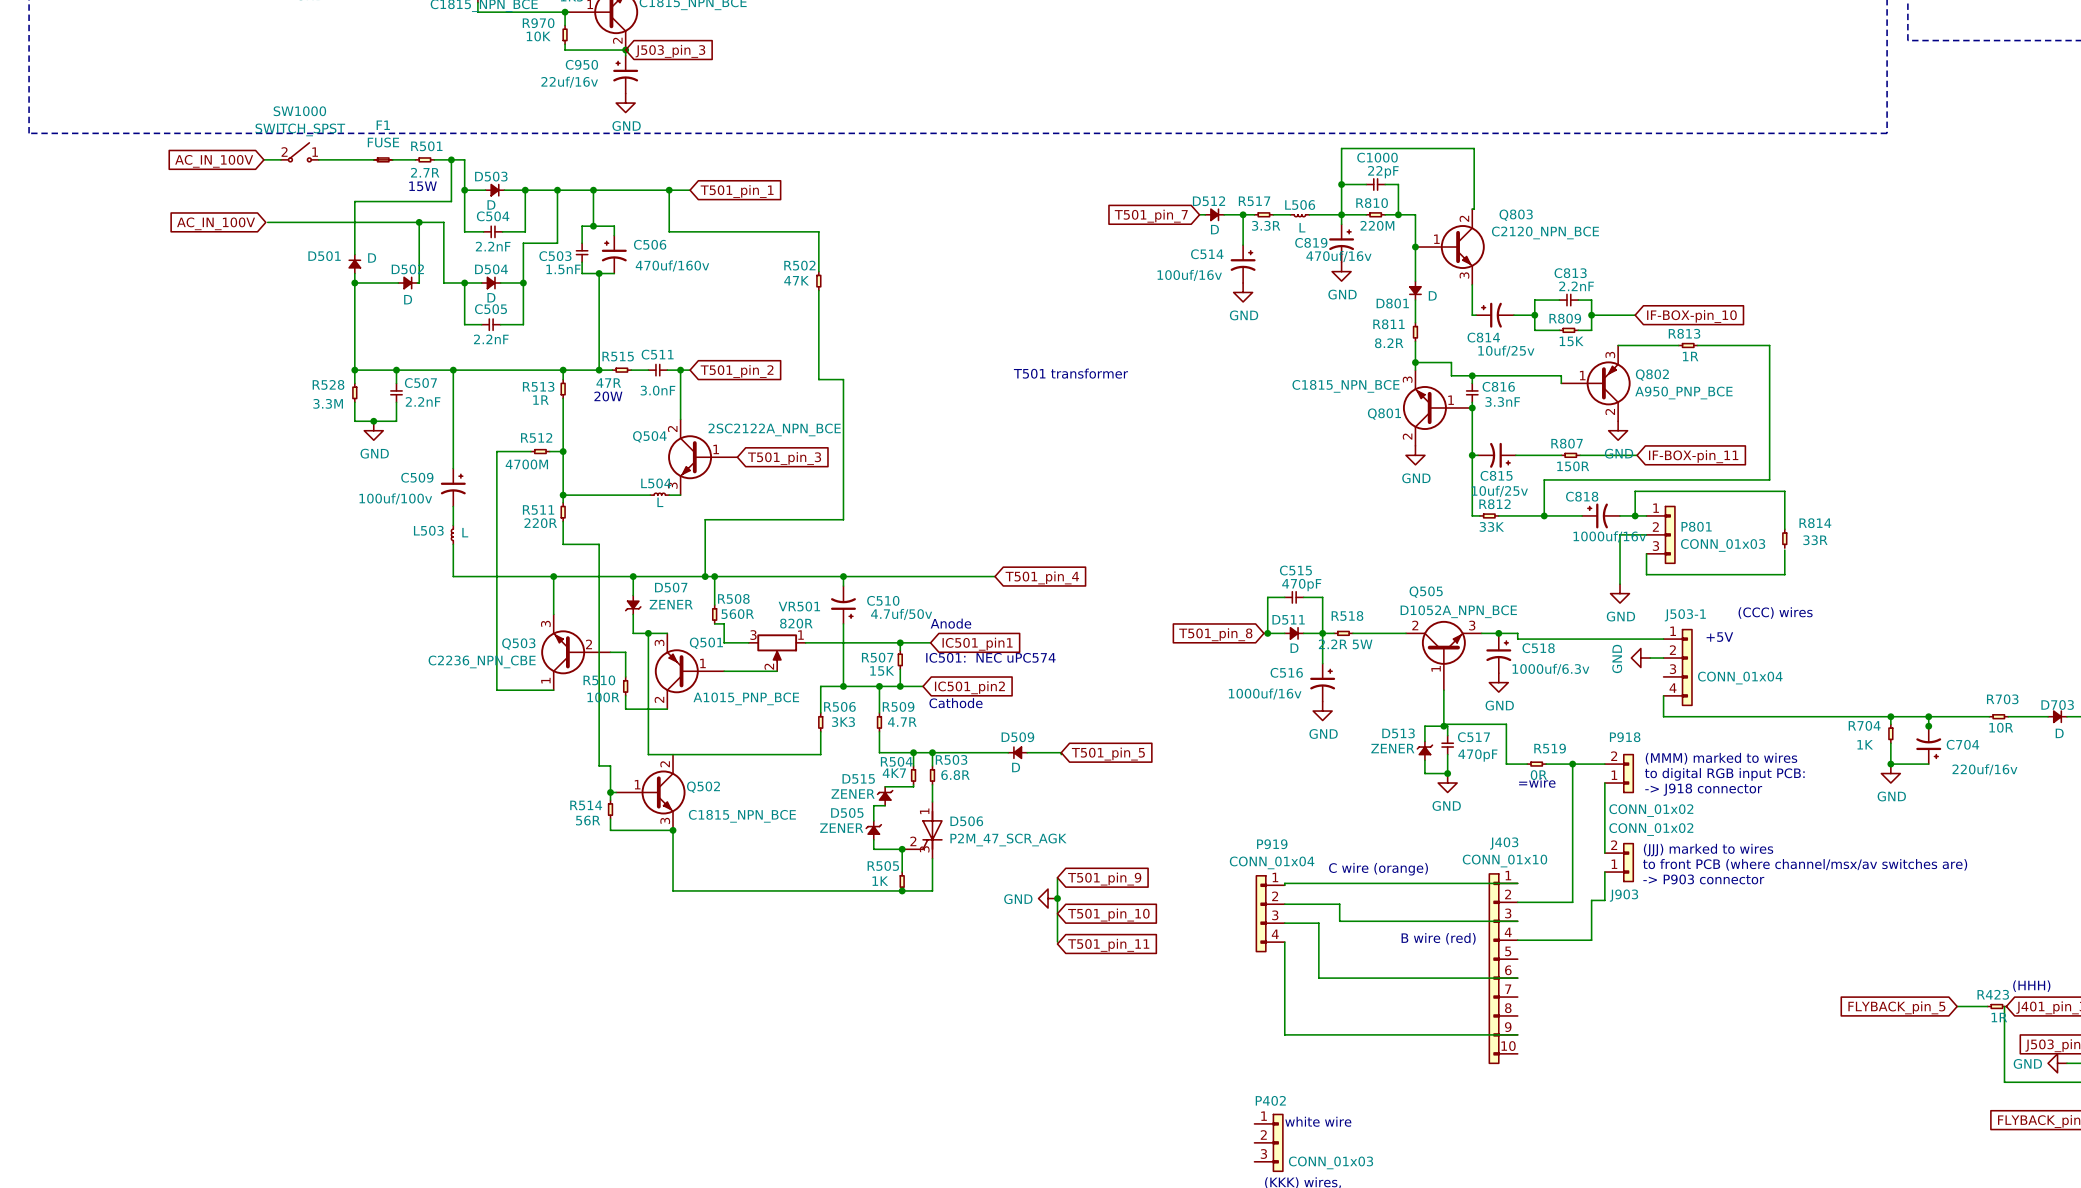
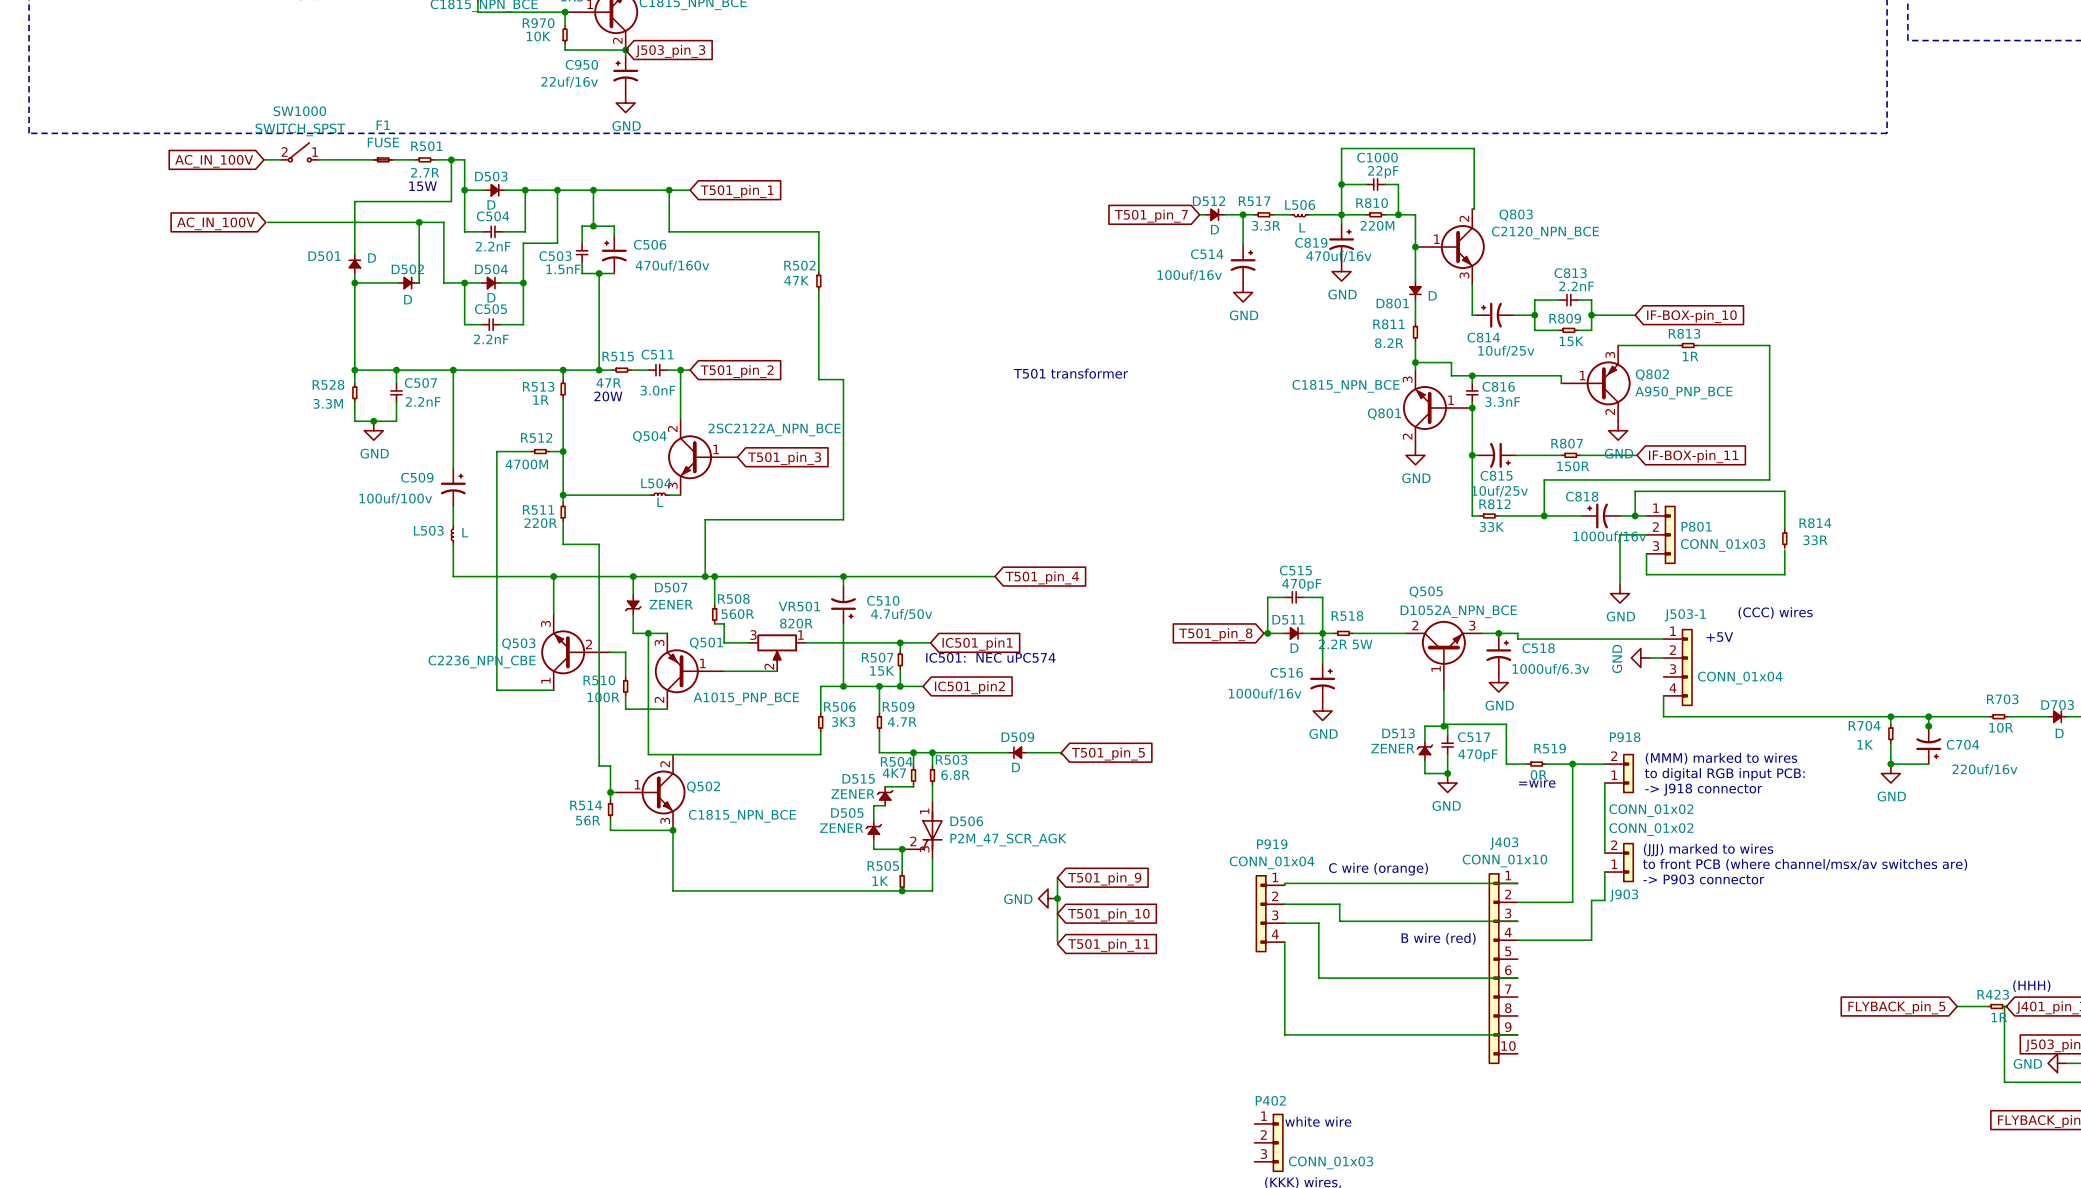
text: Anode (950, 623) -> none
text: Cathode (955, 703) -> none

